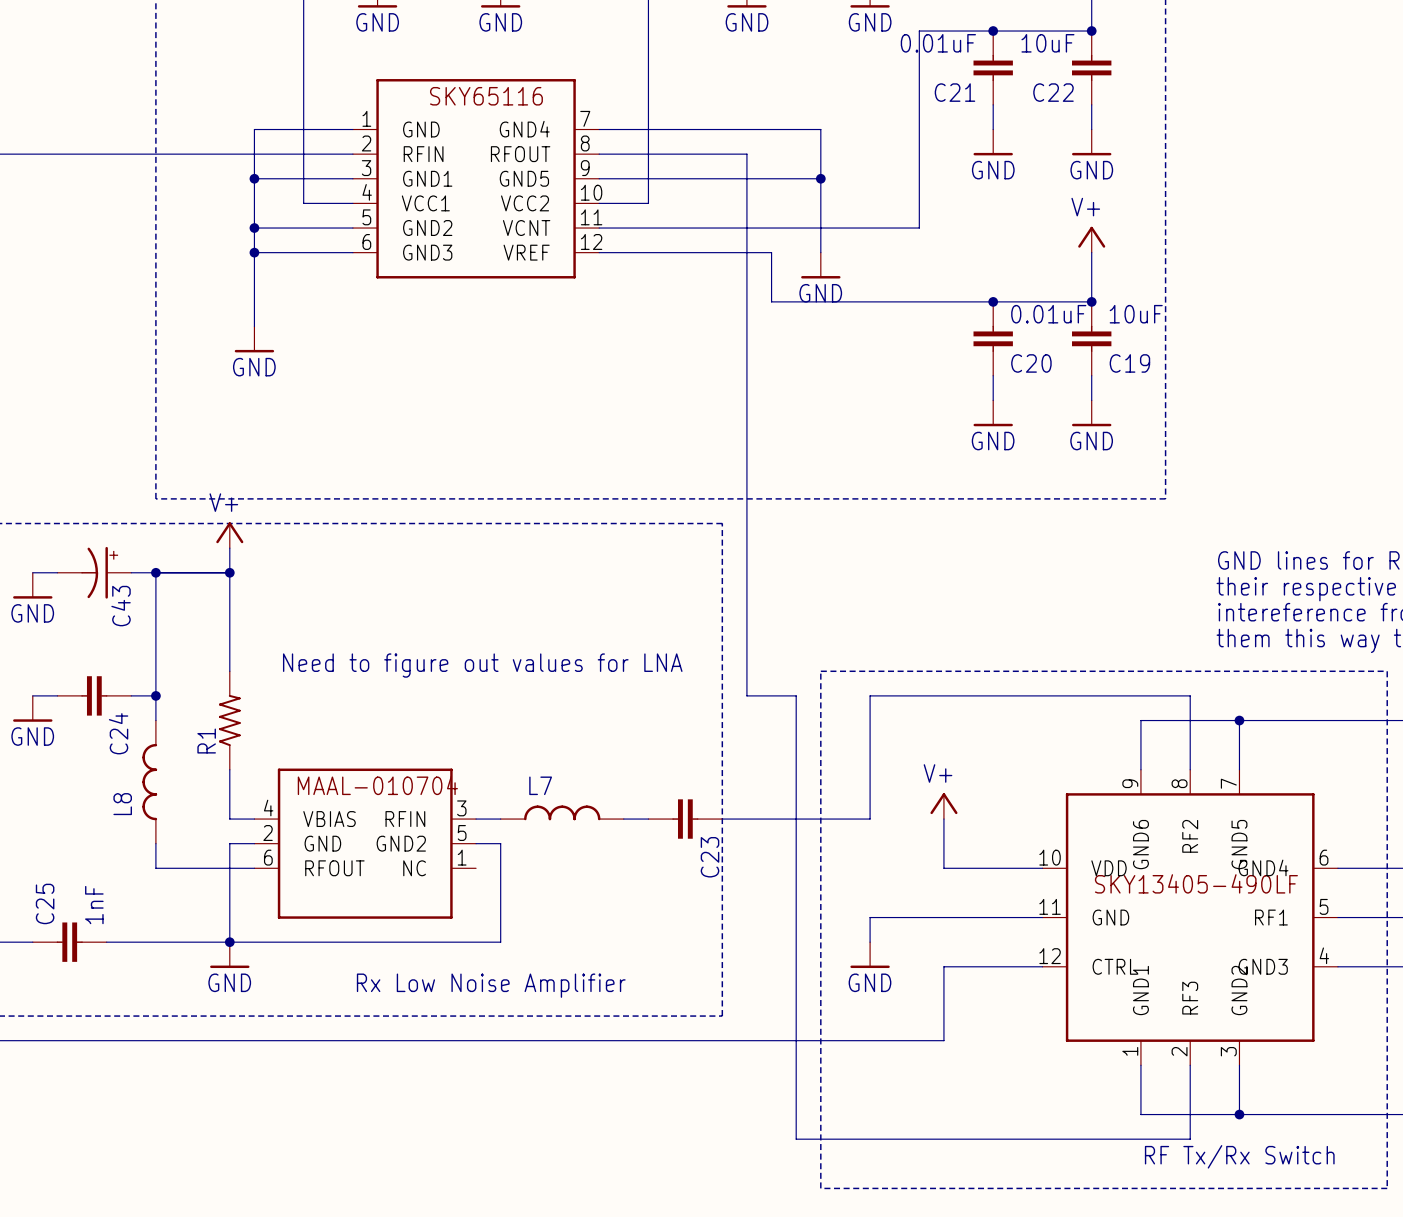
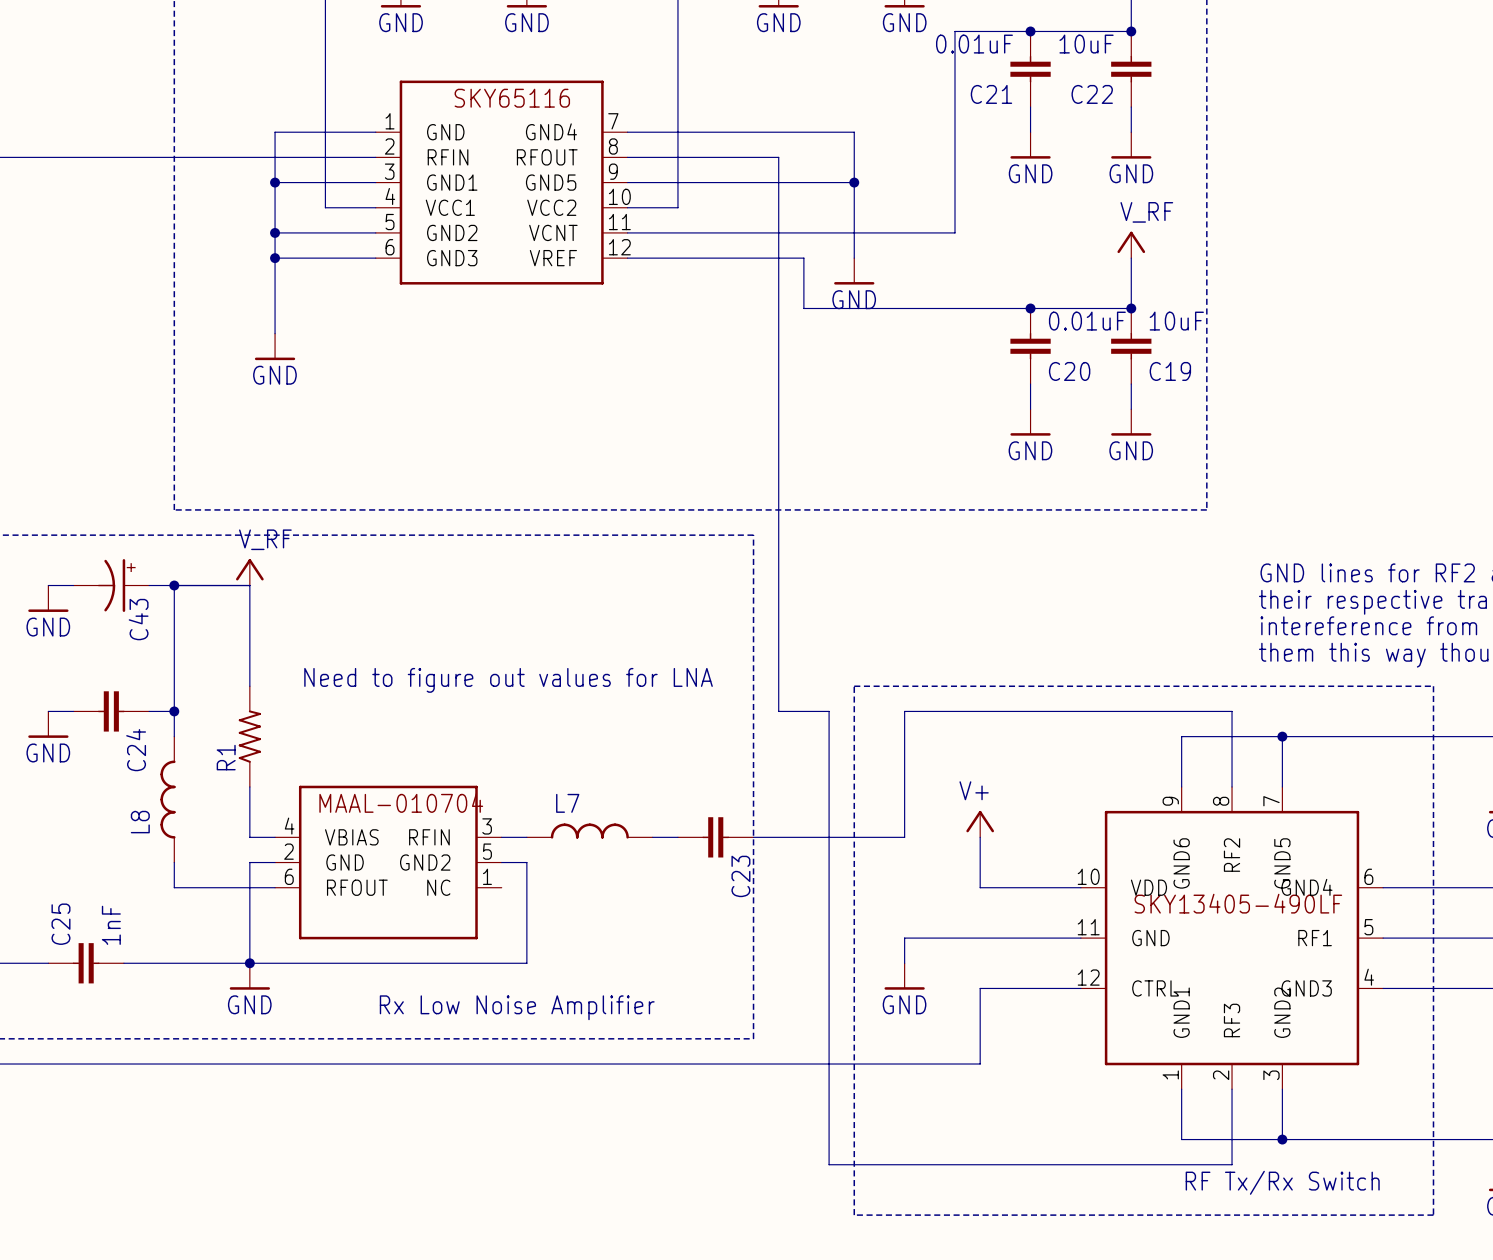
power symbol: V+ (1091, 239) -> V_RF (1131, 244)
power symbol: V+ (229, 535) -> none
power symbol: none -> V_RF (249, 572)
junction: (229, 572) -> none

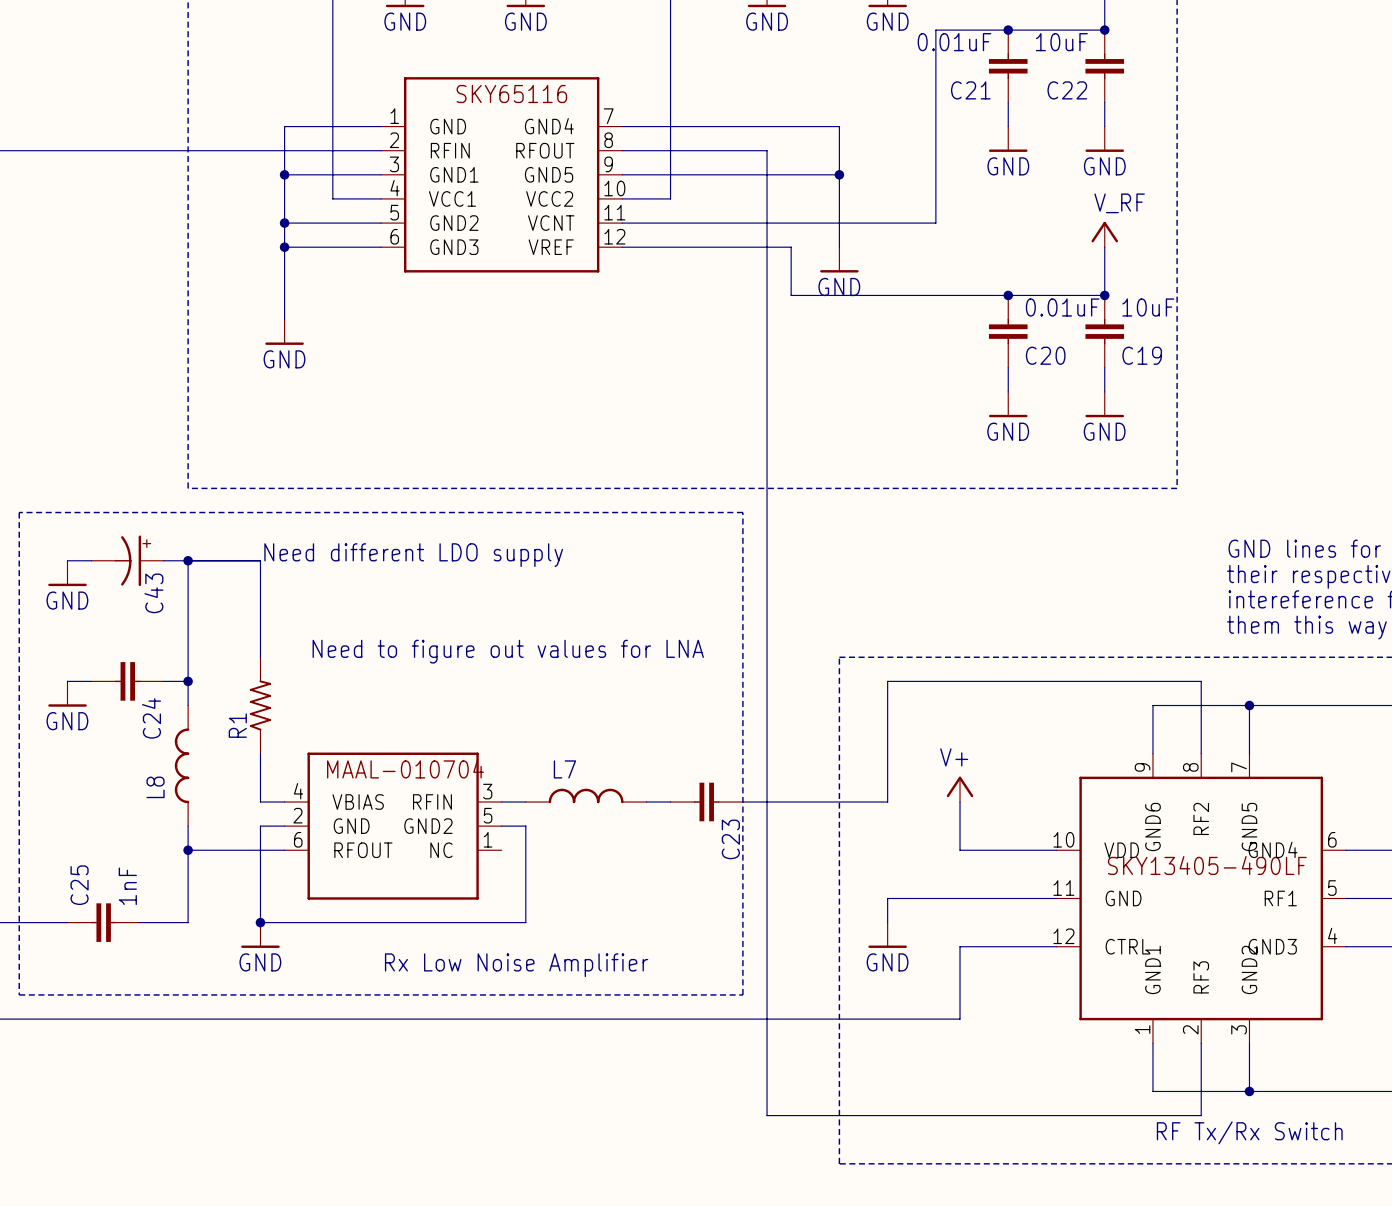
power symbol: V_RF (249, 572) -> none
text: none -> Need different LDO supply (413, 555)
wire: (778, 711) (829, 711) (829, 1164) -> (767, 681) (767, 1115) (815, 1115)
junction: none -> (188, 850)
wire: (174, 963) (249, 963) -> (188, 922) (188, 850)

